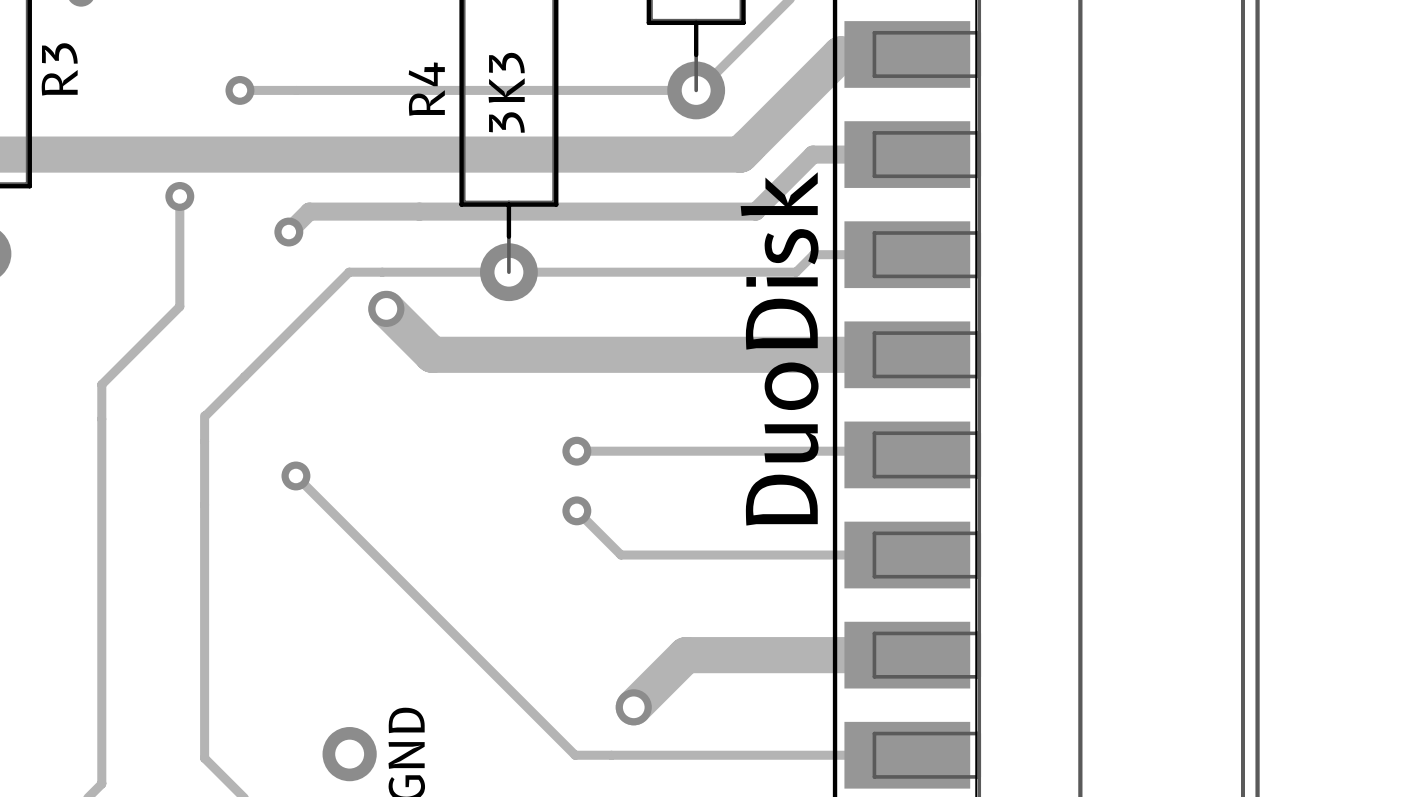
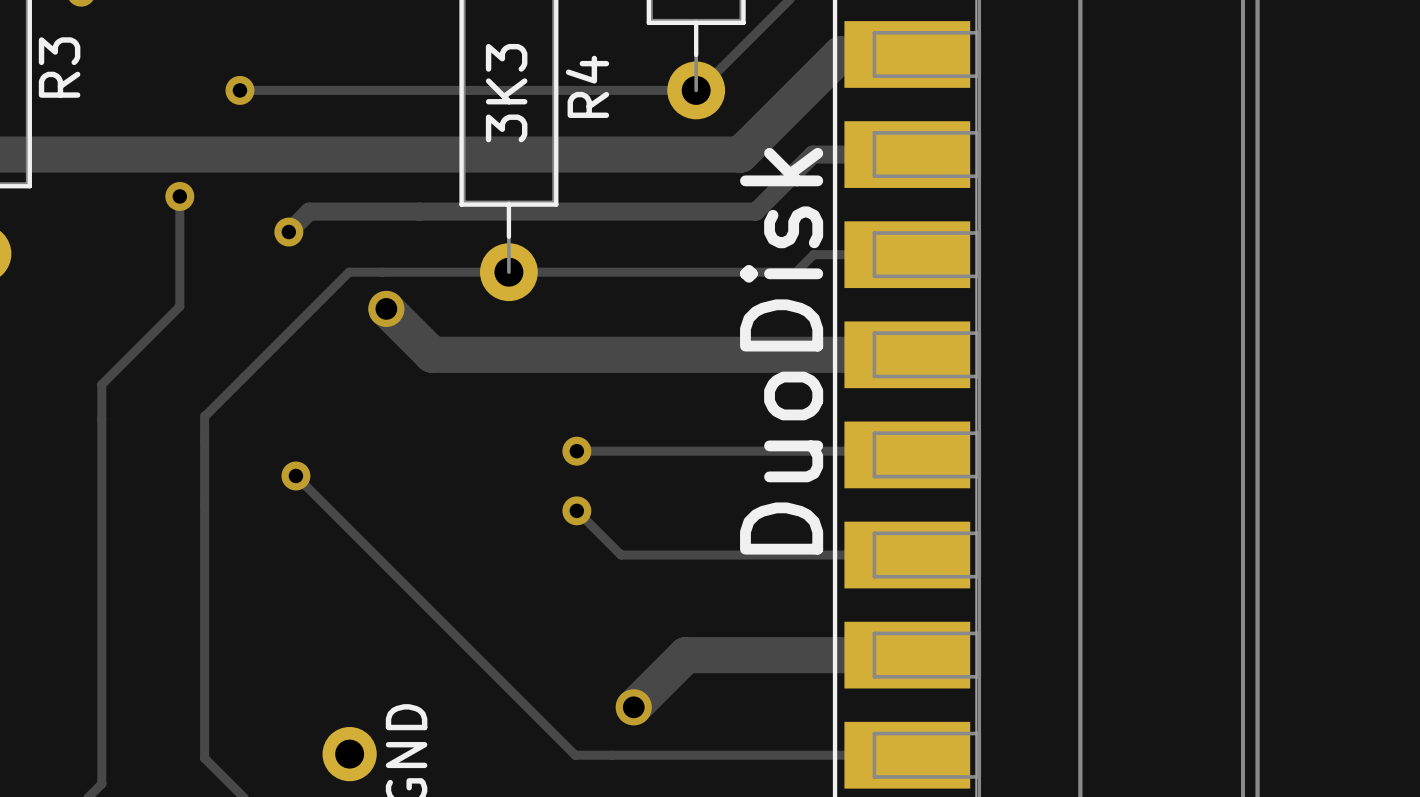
R4 name position: R4 (426, 89) -> R4 (587, 86)

